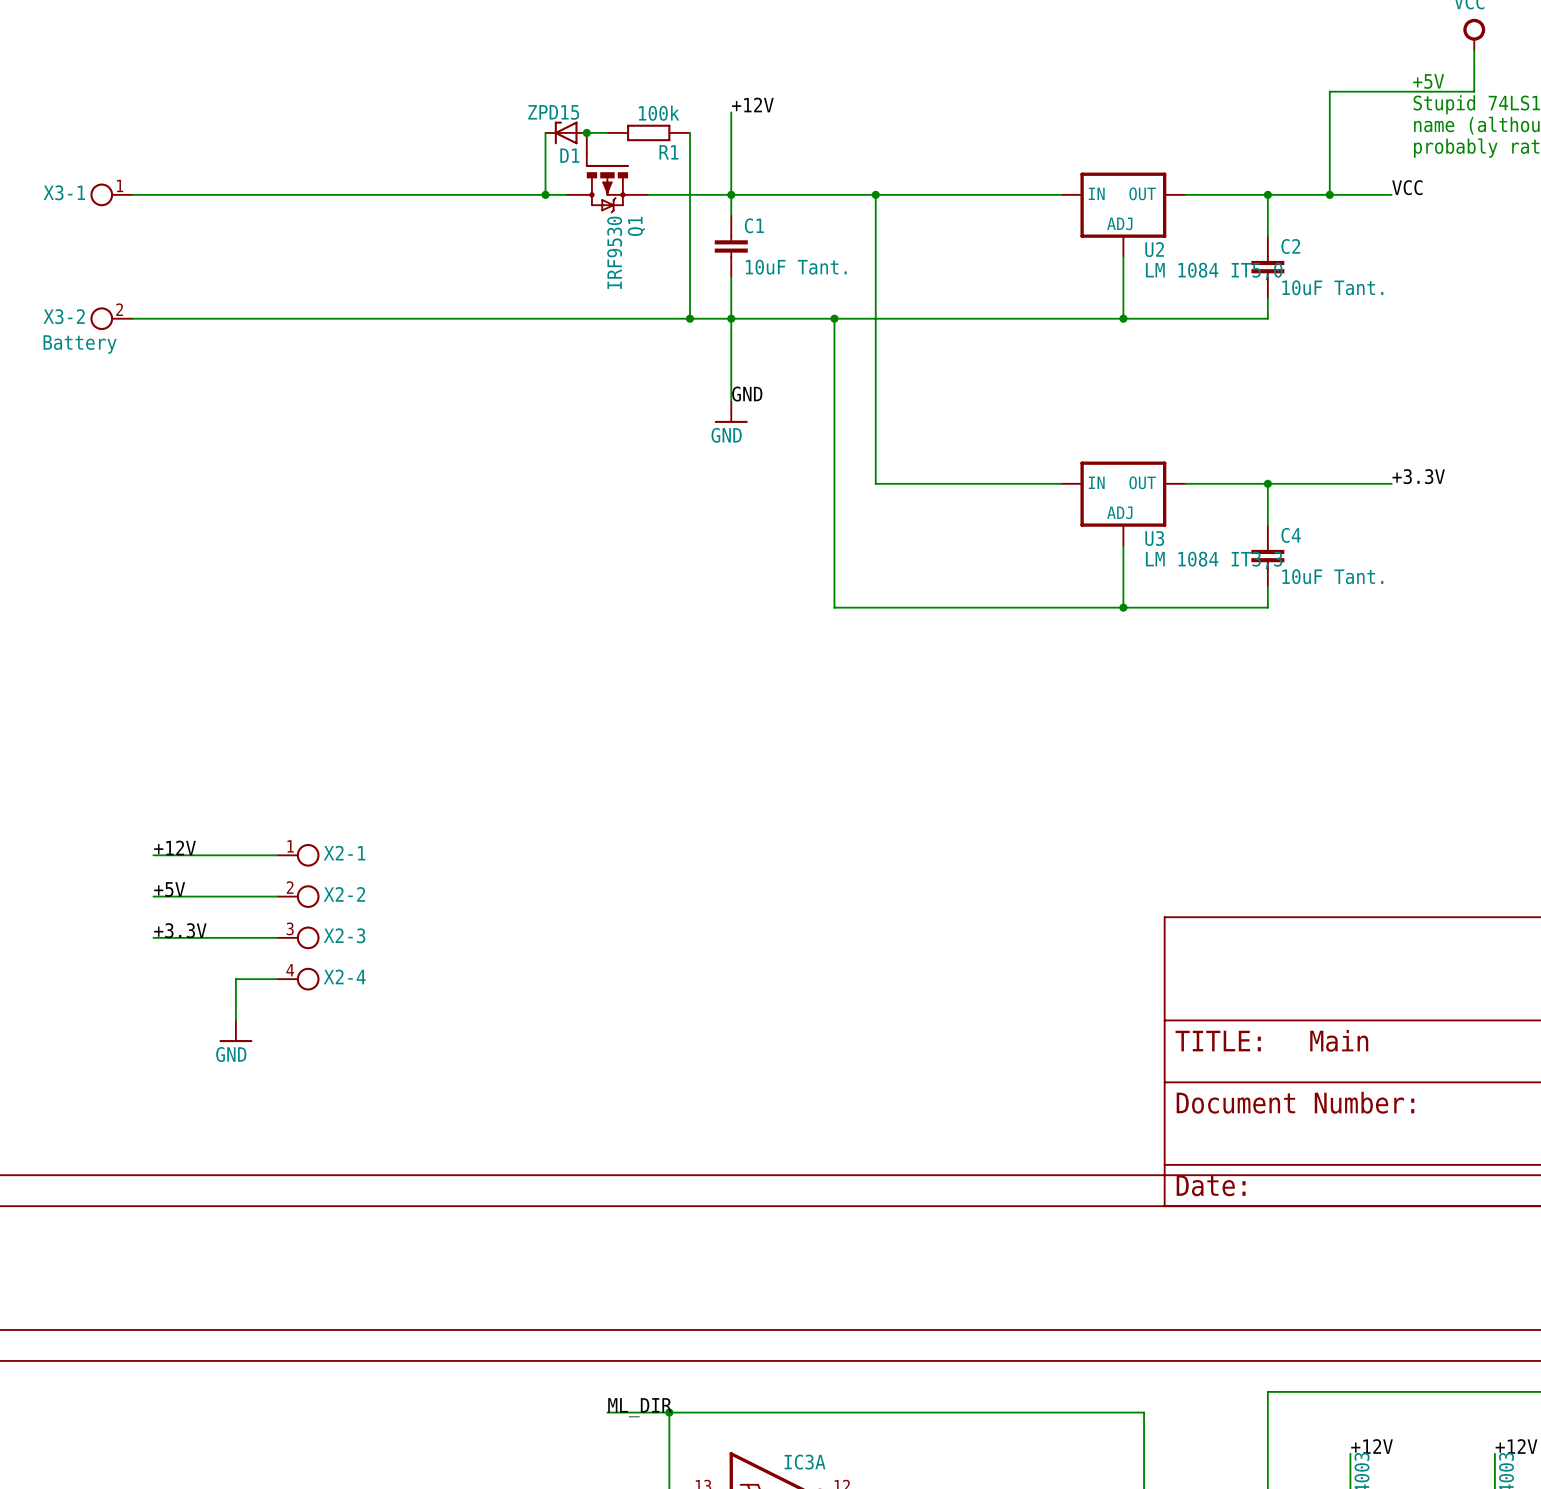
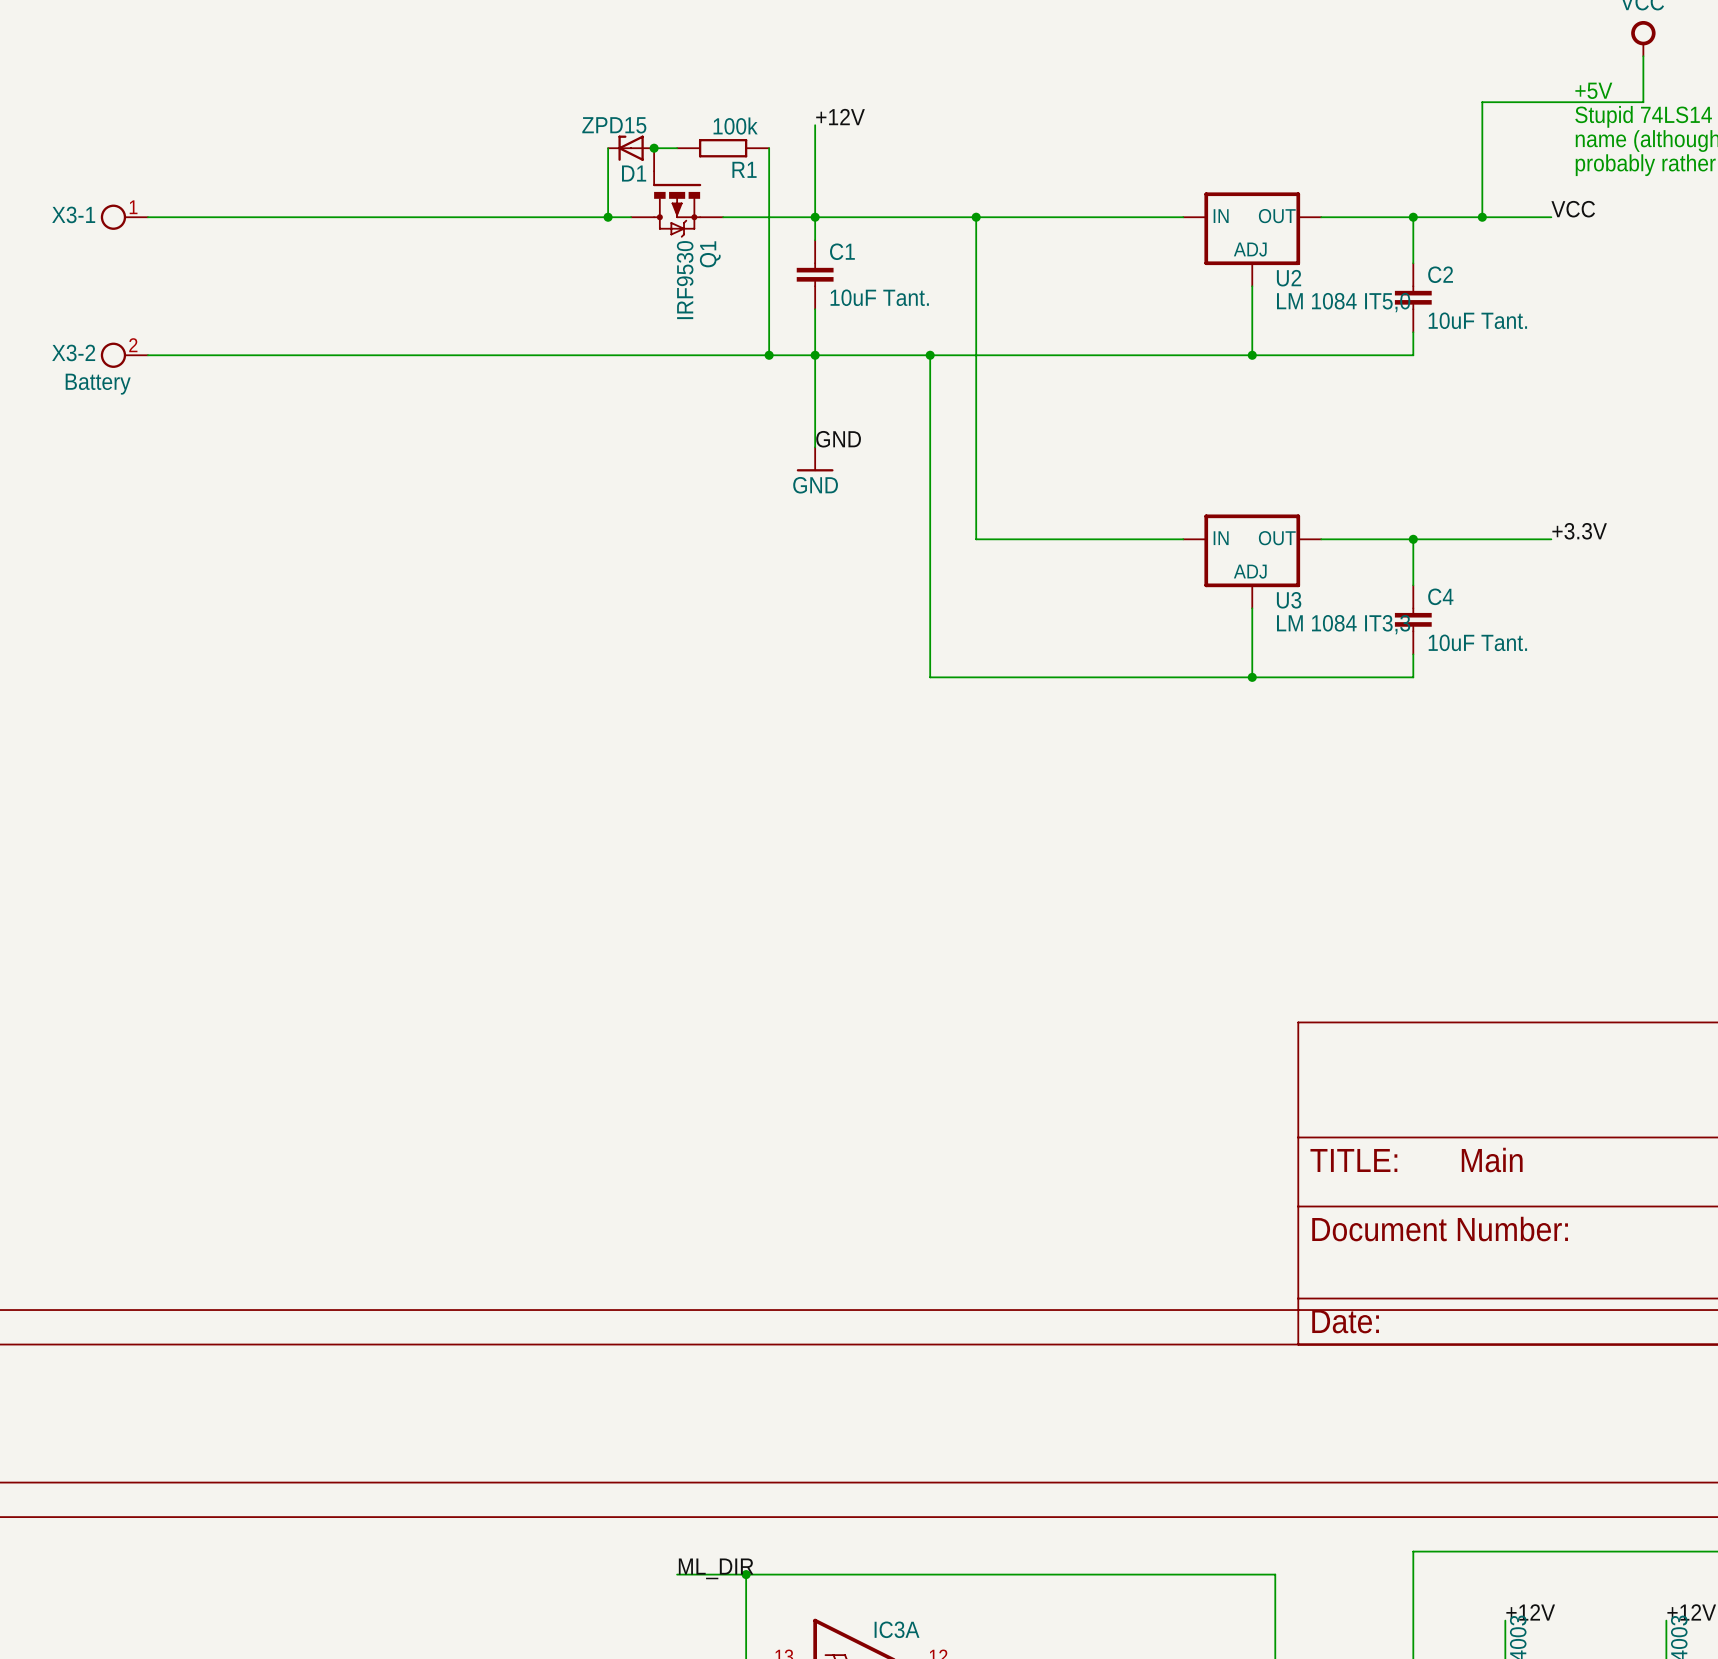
label: +12V (174, 847) -> none
wire: (153, 855) (277, 855) -> none
X2-1: (298, 855) -> none
label: +5V (169, 889) -> none
wire: (153, 896) (277, 896) -> none
X2-2: (298, 896) -> none
label: +3.3V (180, 930) -> none
wire: (153, 937) (277, 937) -> none
X2-3: (298, 937) -> none
wire: (277, 979) (235, 979) (235, 1020) -> none
X2-4: (298, 979) -> none
power symbol: GND (235, 1031) -> none

